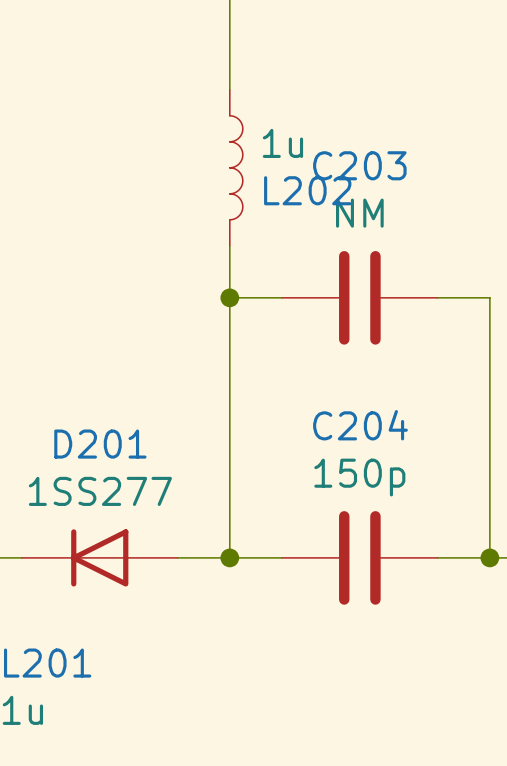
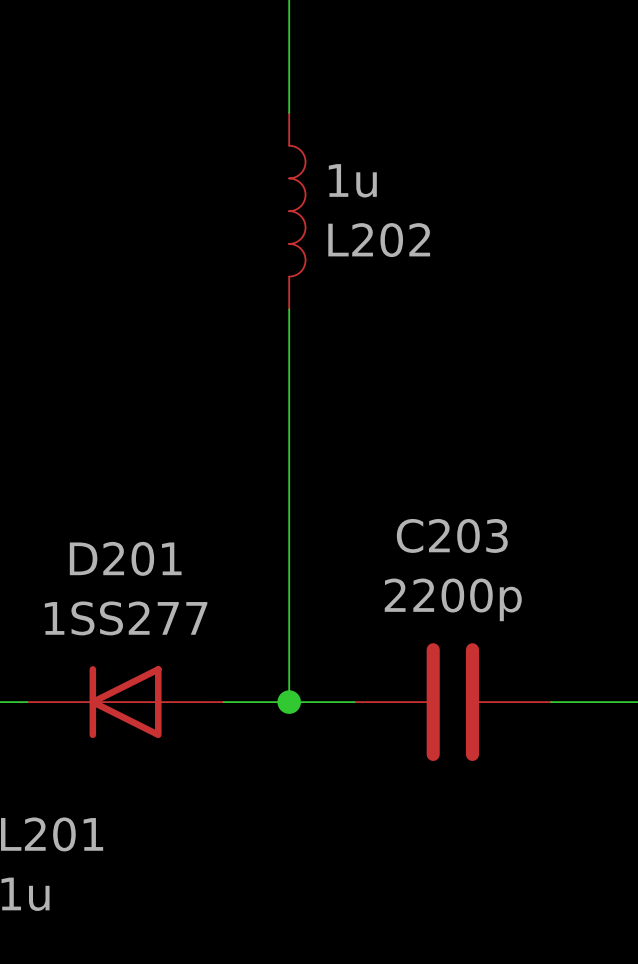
wire: (229, 297) (281, 297) -> none
junction: (229, 297) -> none
C203: NM (359, 297) -> none
wire: (437, 297) (489, 297) (489, 557) -> none
C204 name: C204 (360, 425) -> C203 (452, 535)
C204 value: 150p (359, 477) -> 2200p (453, 599)
junction: (489, 557) -> none

